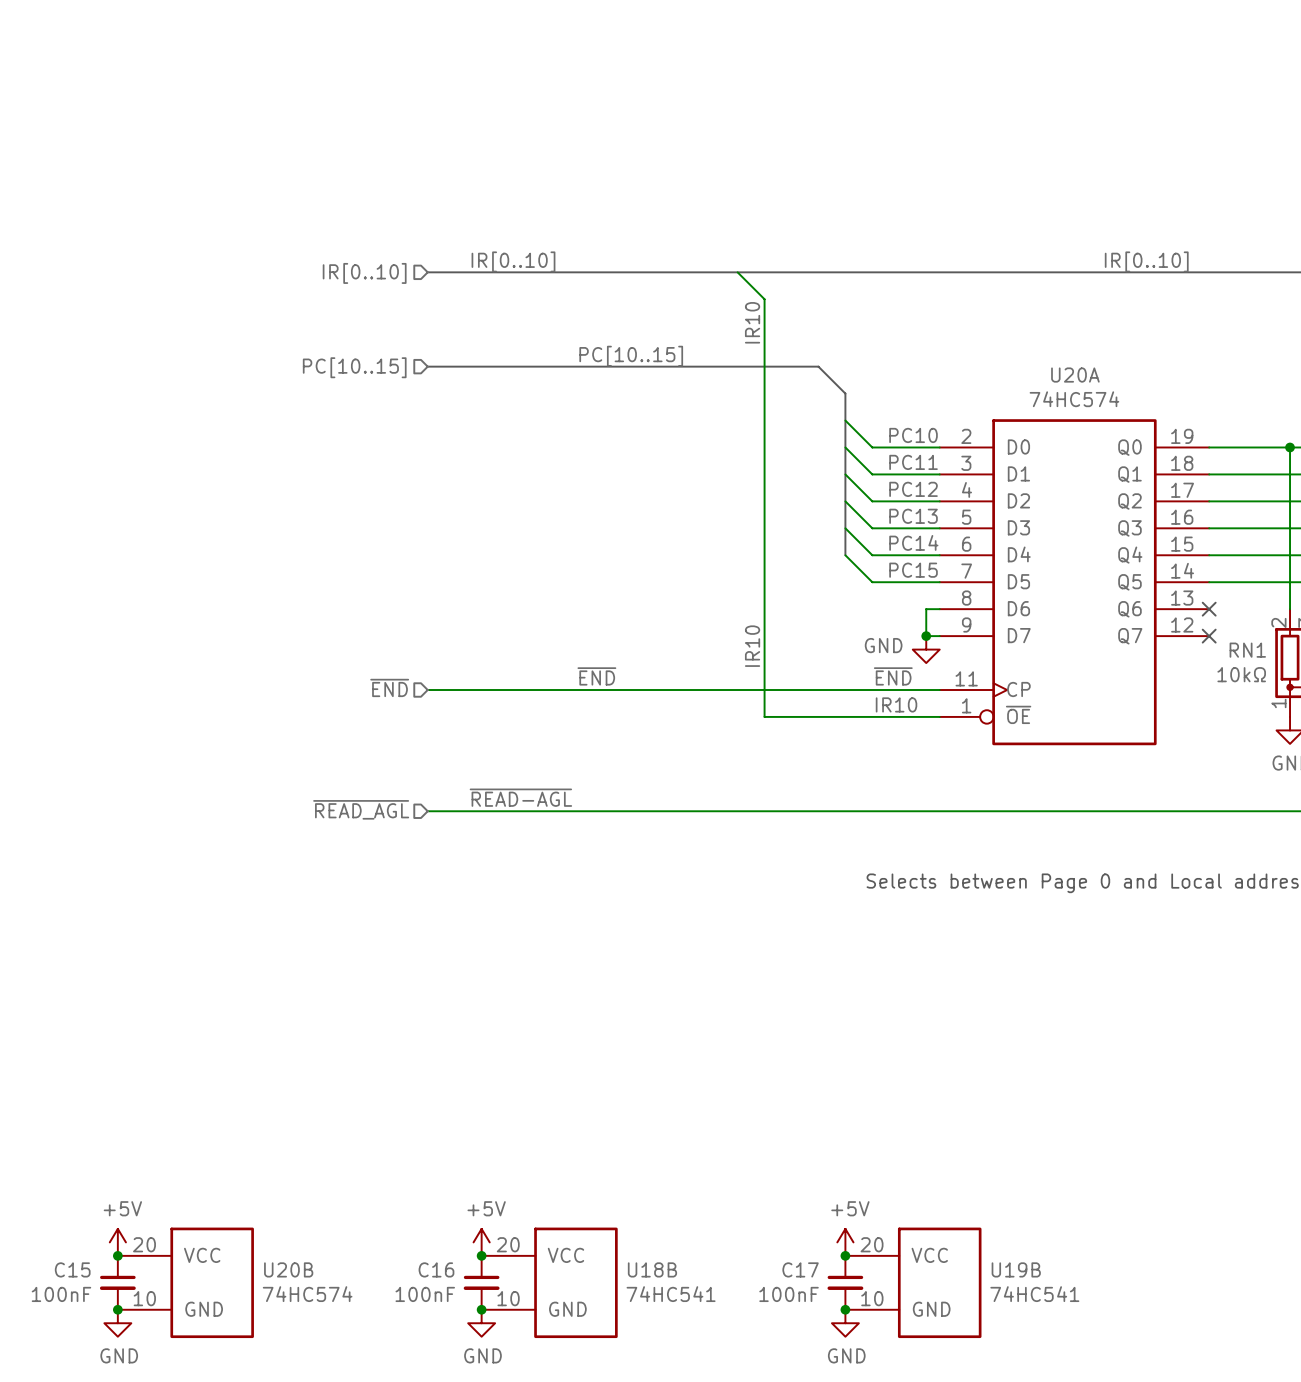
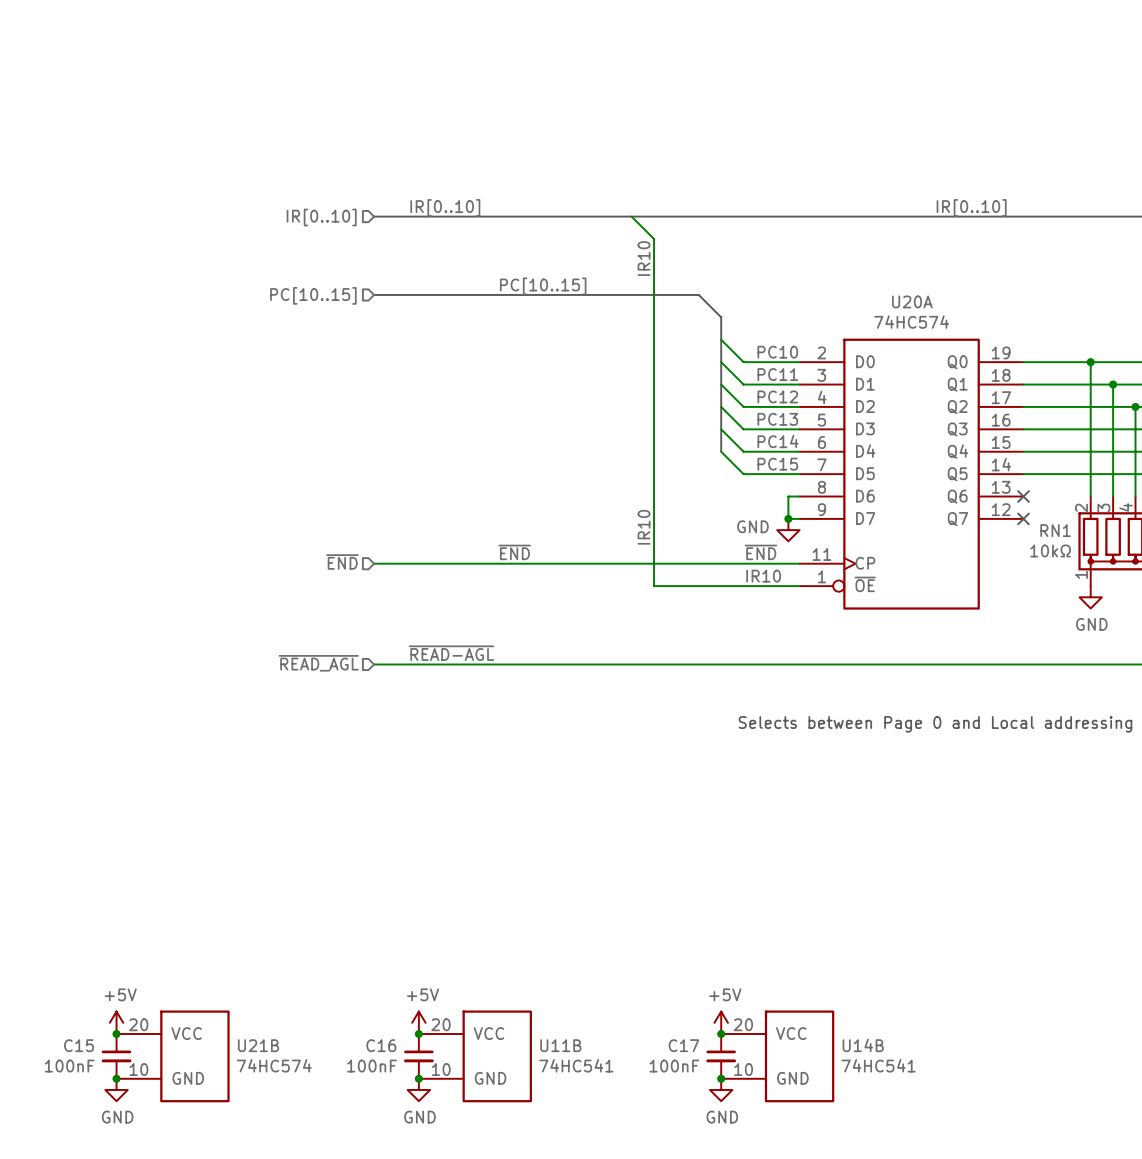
U20B name: U20B (288, 1269) -> U21B (258, 1045)
U18B name: U18B (652, 1269) -> U11B (560, 1045)
U19B name: U19B (1016, 1269) -> U14B (863, 1045)

